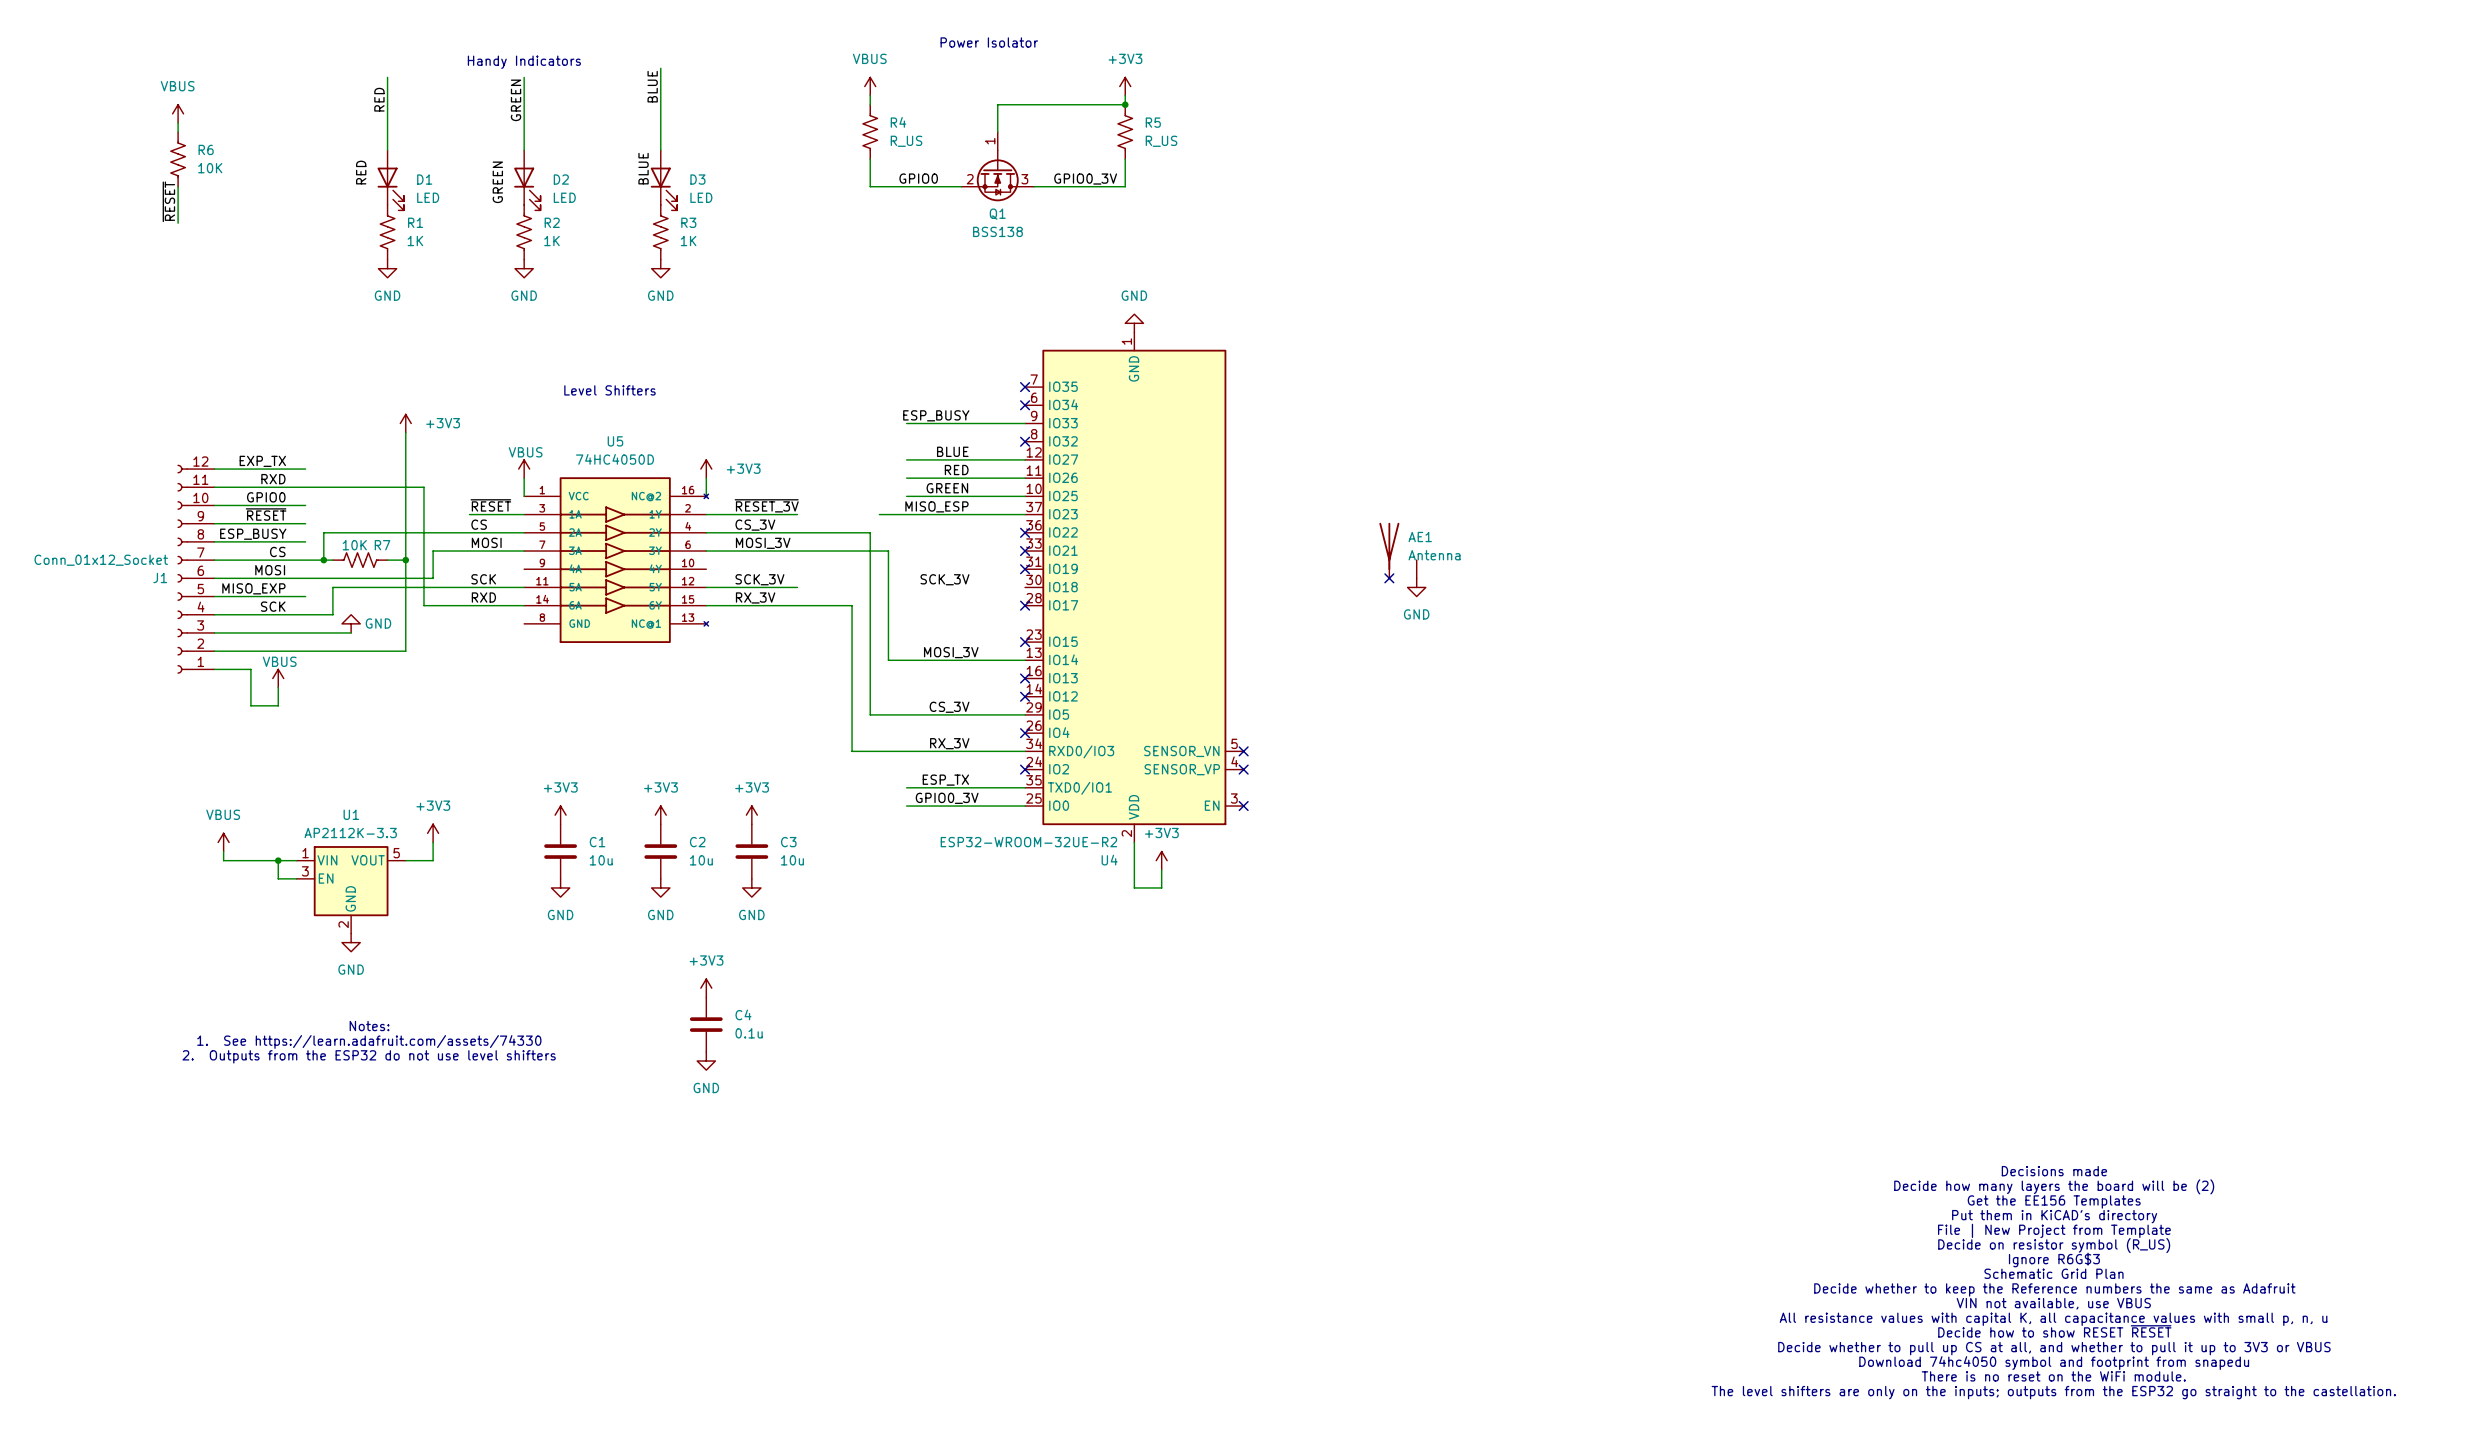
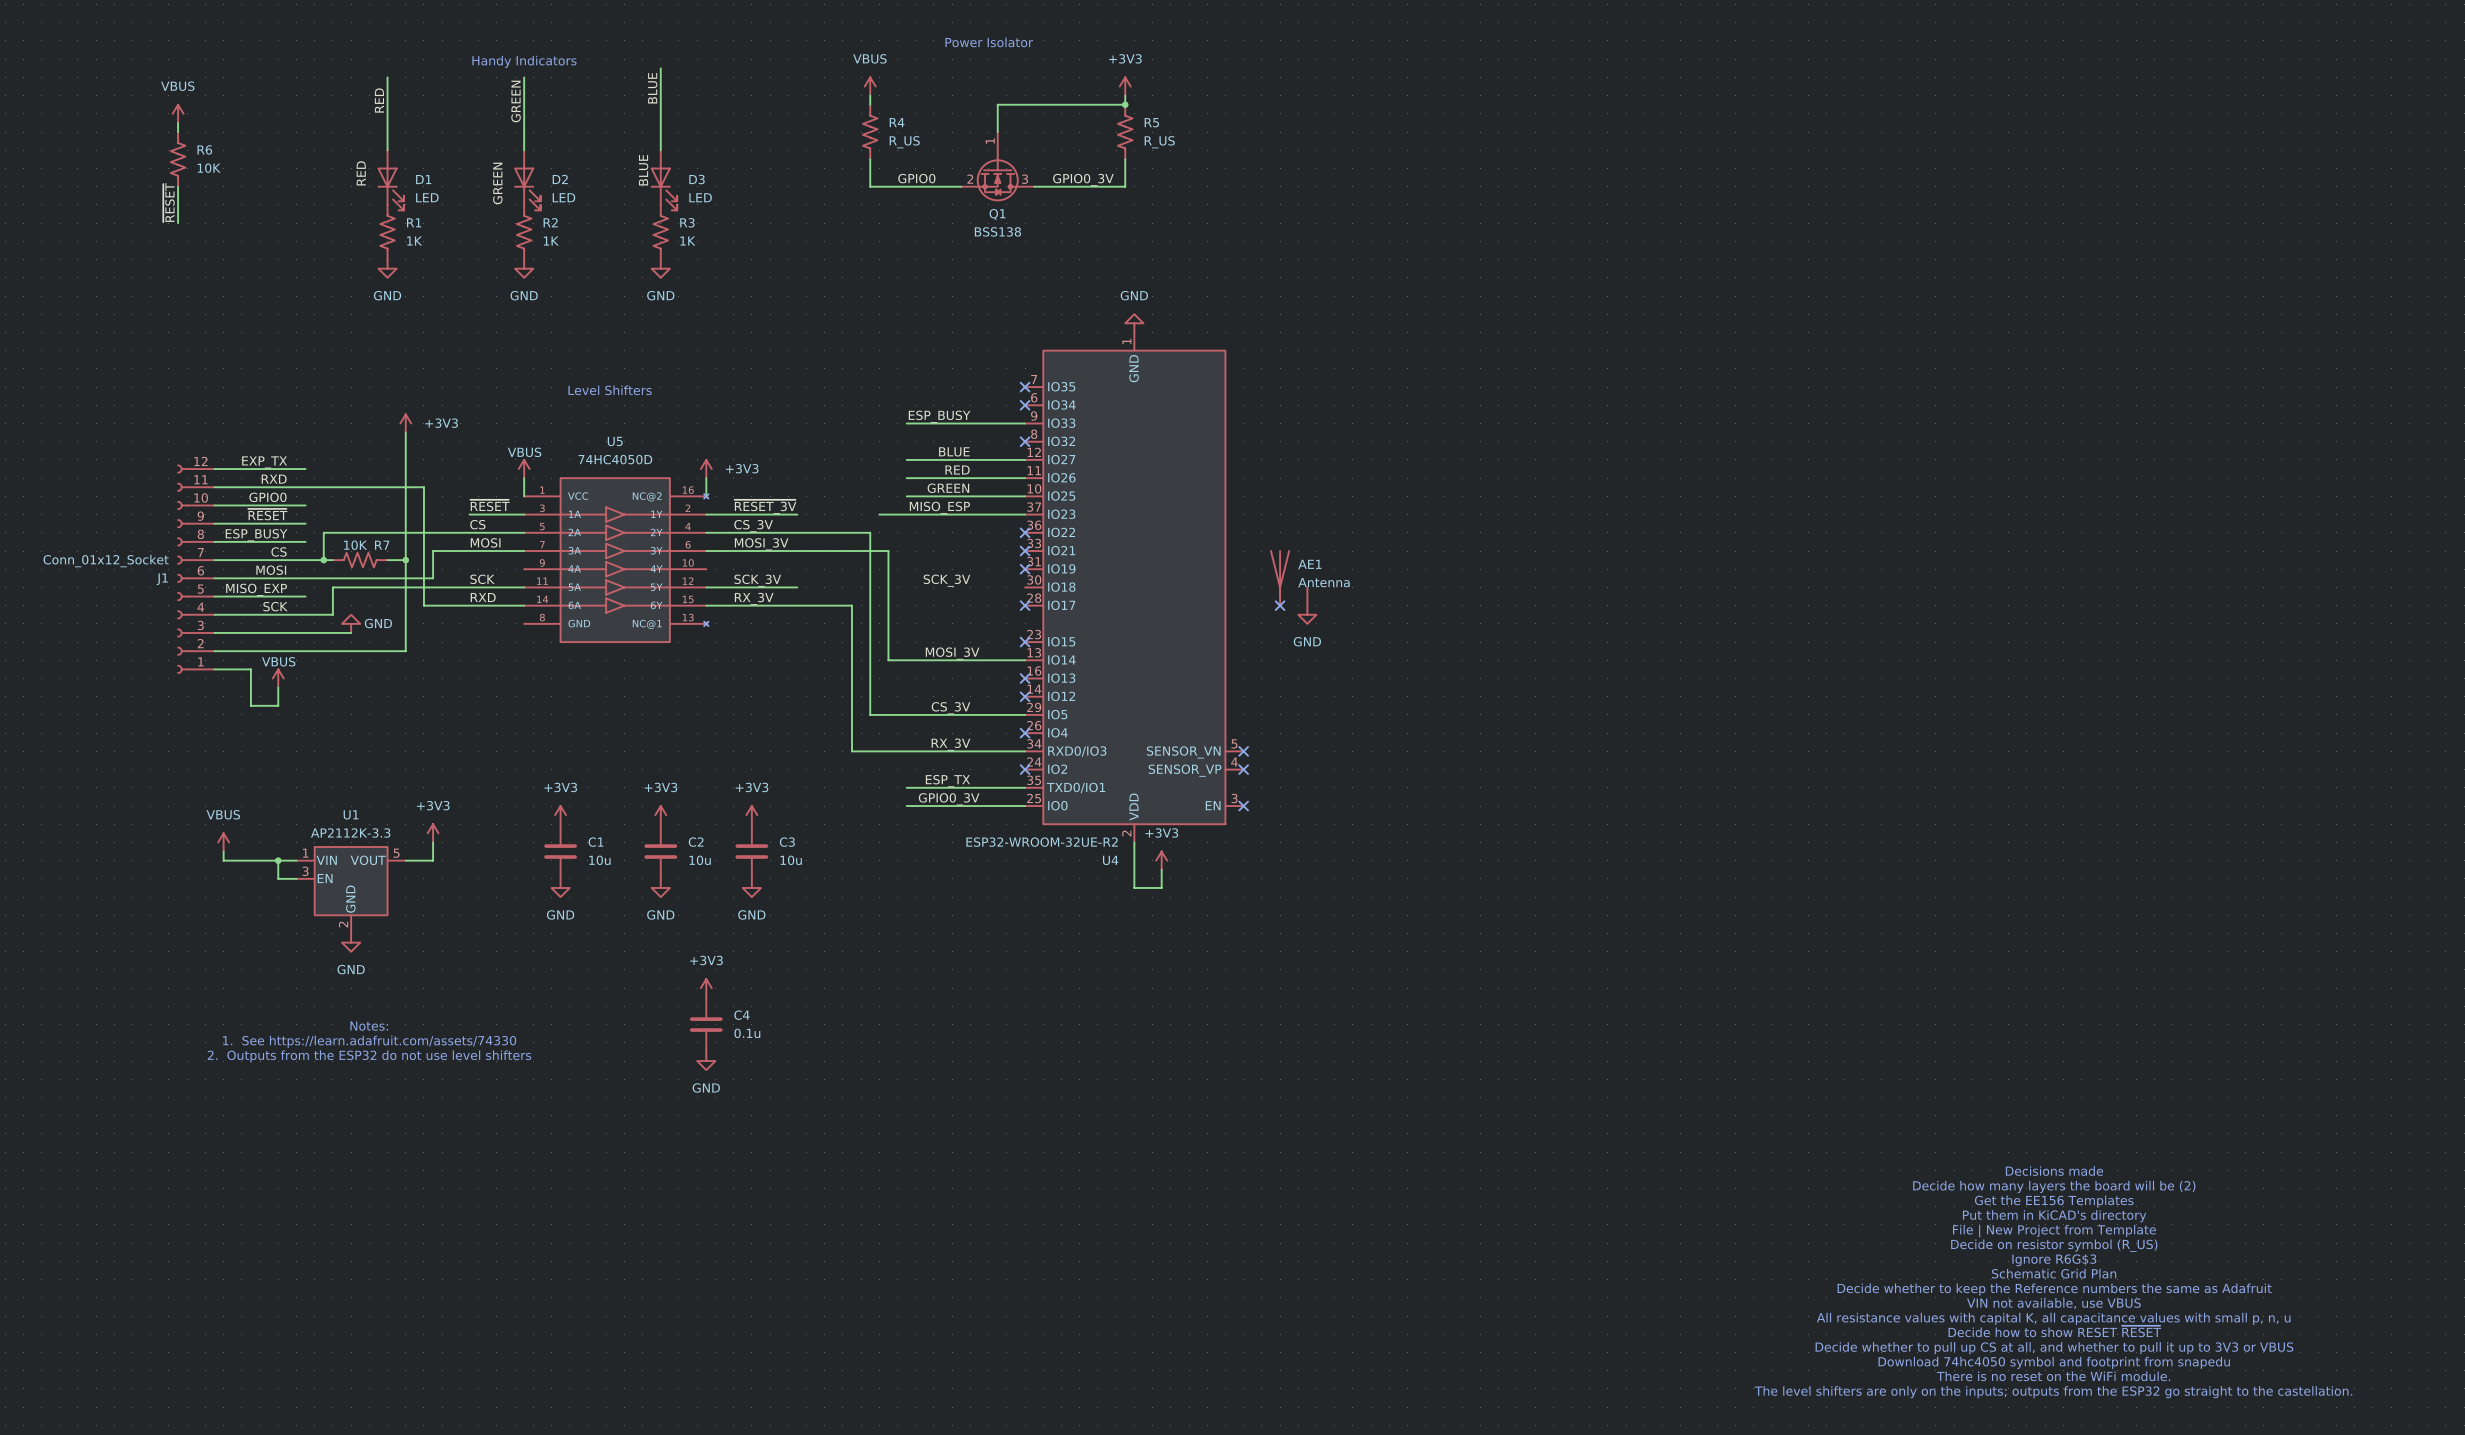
AE1 position: (1398, 550) -> (1288, 577)
no-connect mark: (1389, 578) -> none
power symbol position: GND (1416, 587) -> GND (1307, 614)
no-connect mark: none -> (1280, 605)

